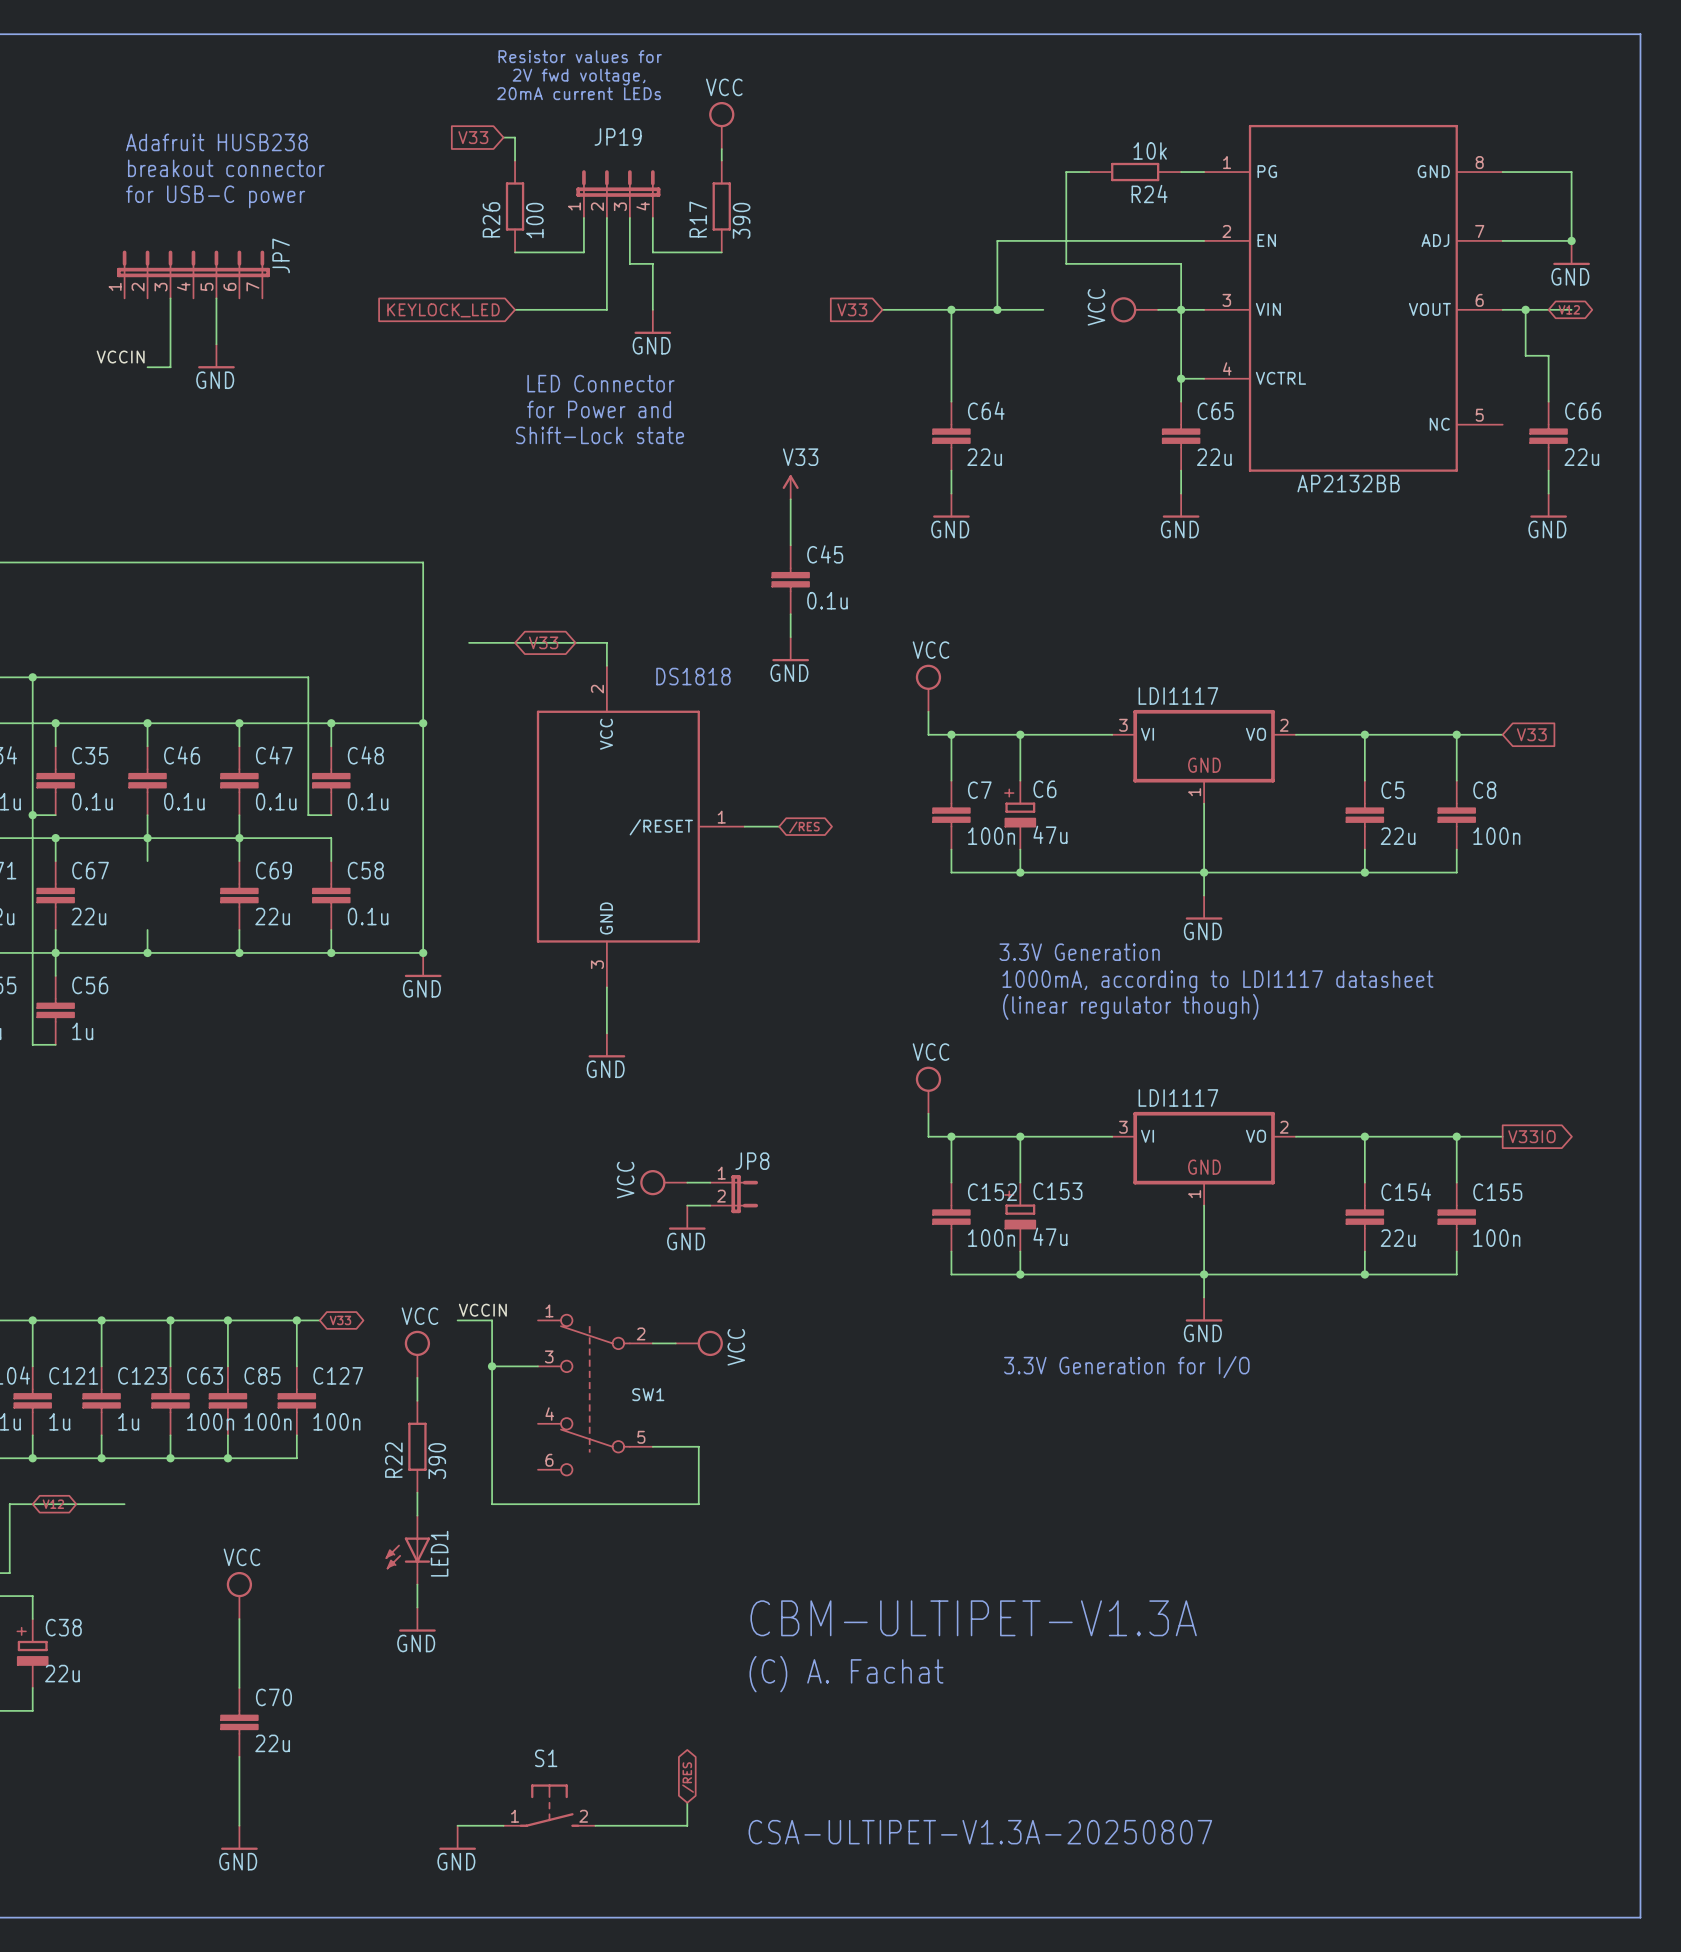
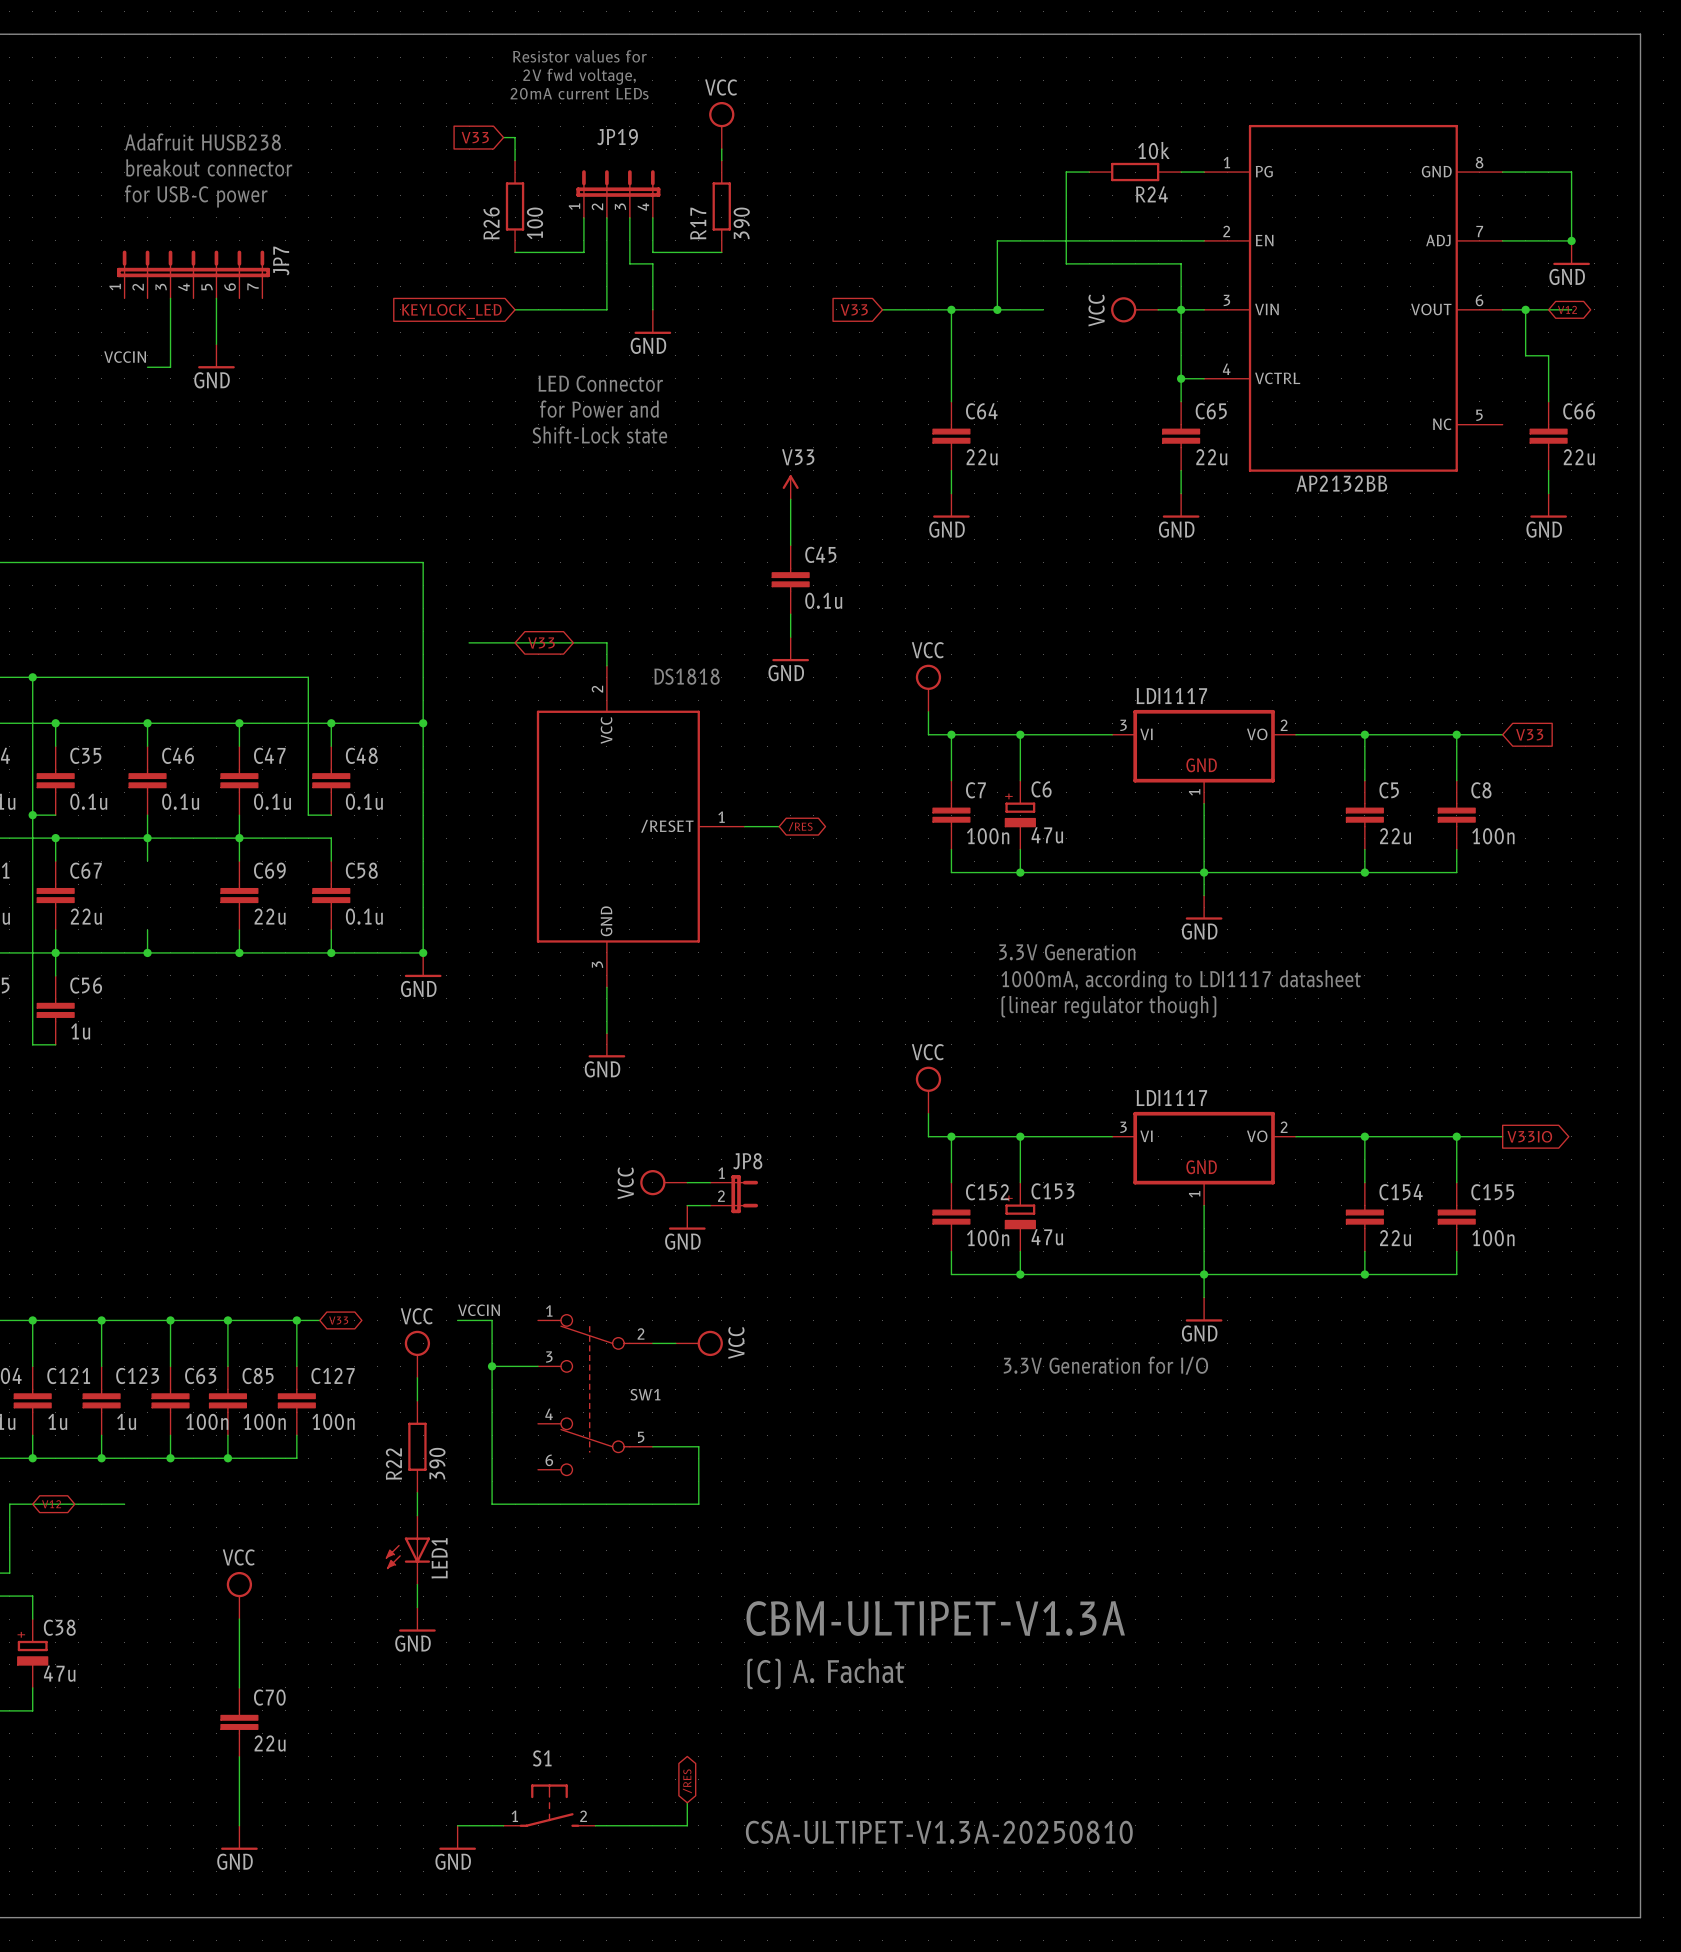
C38 value: 22u (62, 1673) -> 47u (59, 1673)
text: CSA-ULTIPET-V1.3A-20250807 (980, 1832) -> CSA-ULTIPET-V1.3A-20250810 (939, 1832)

